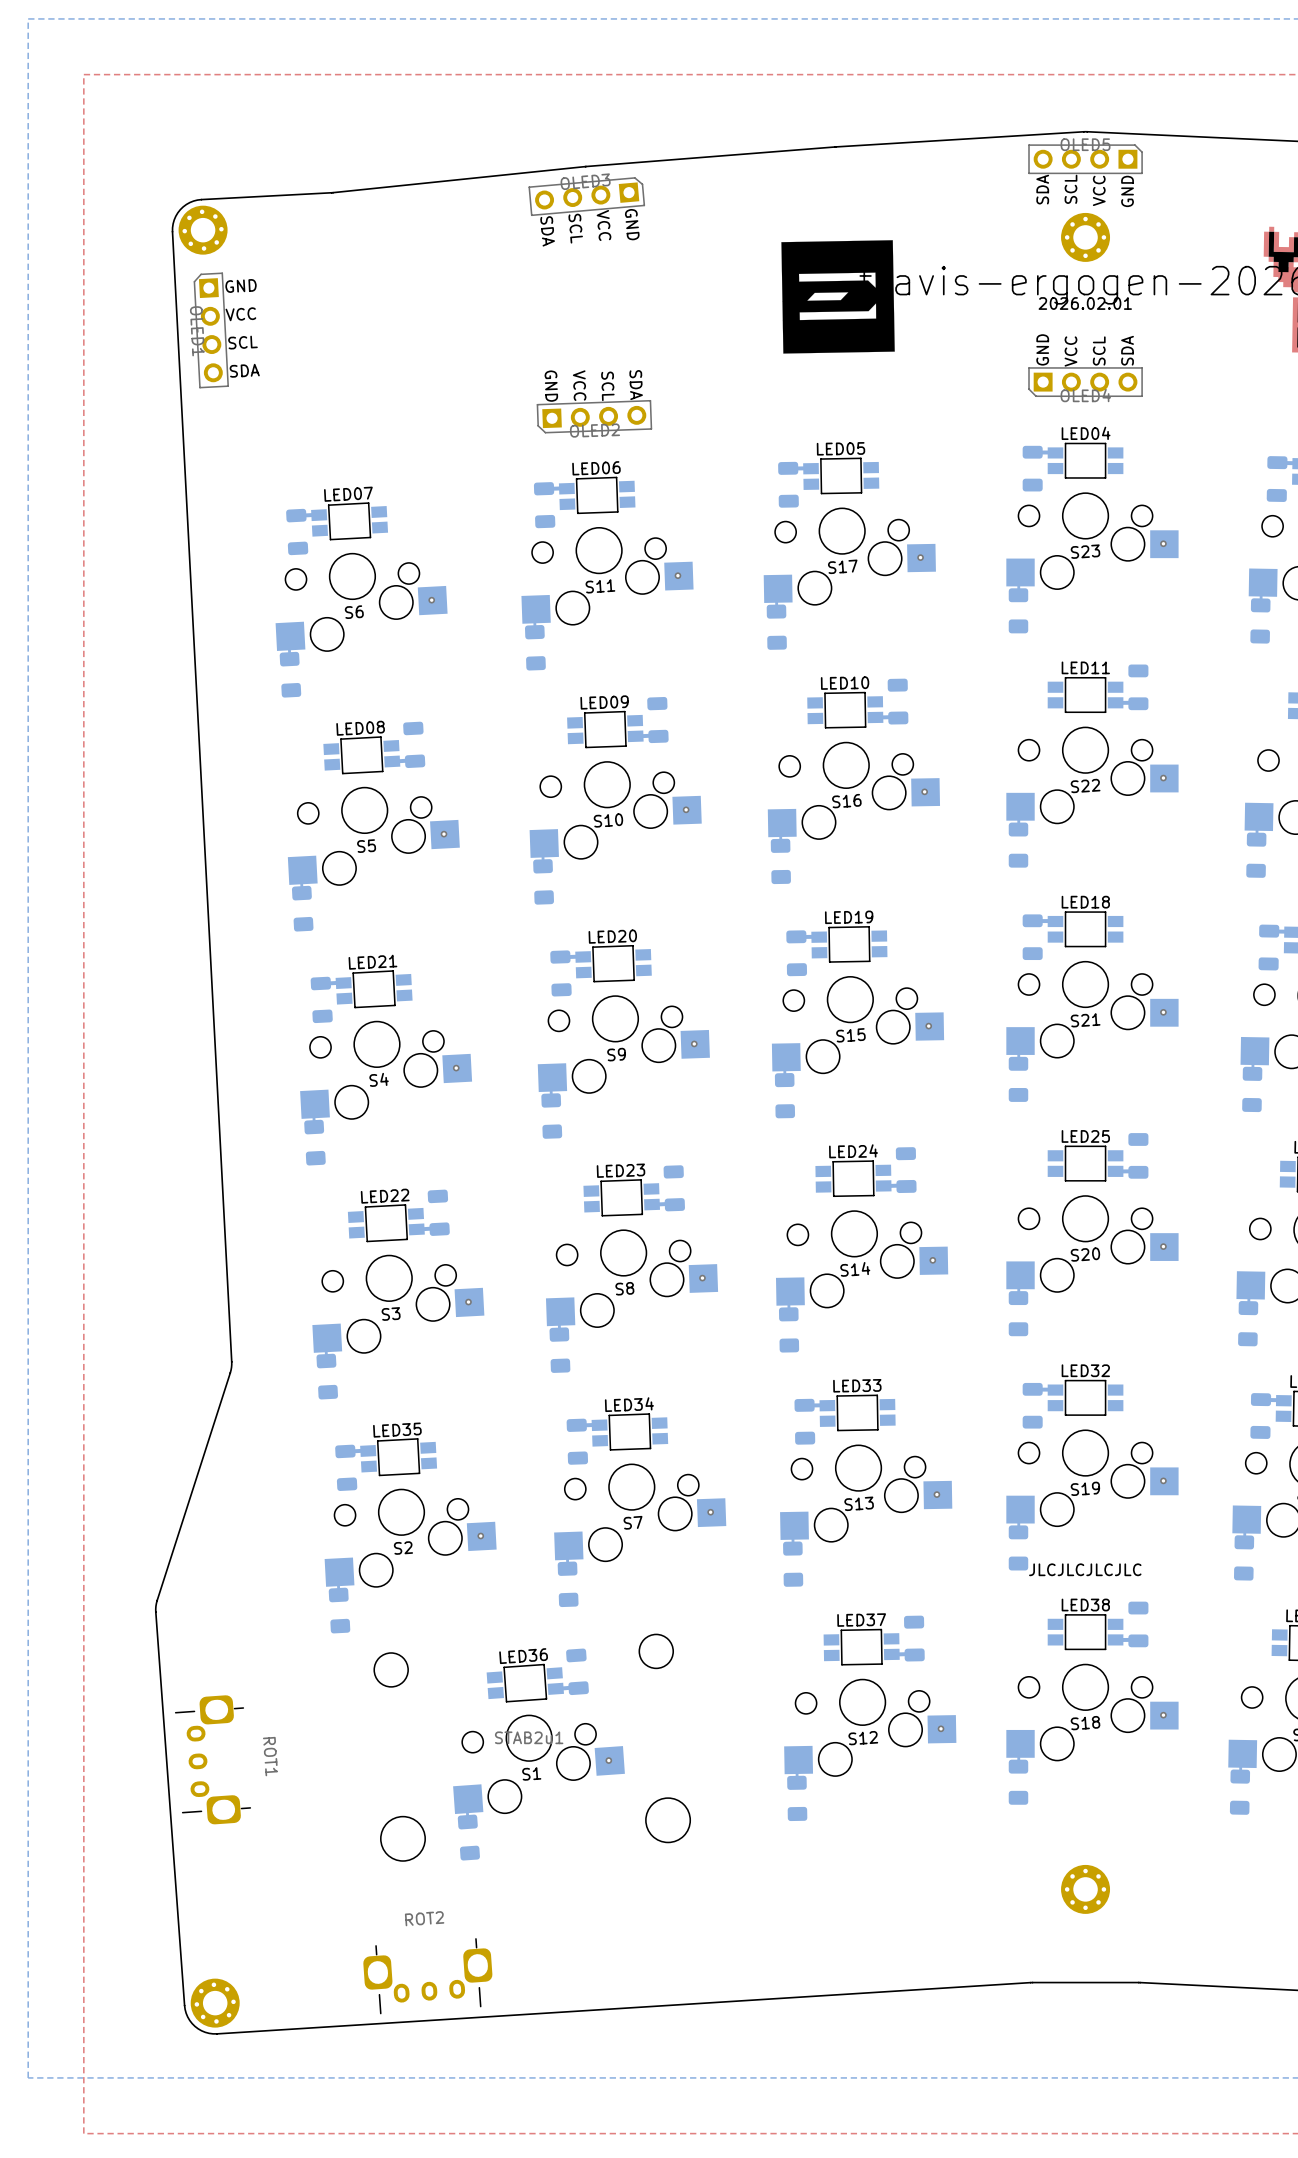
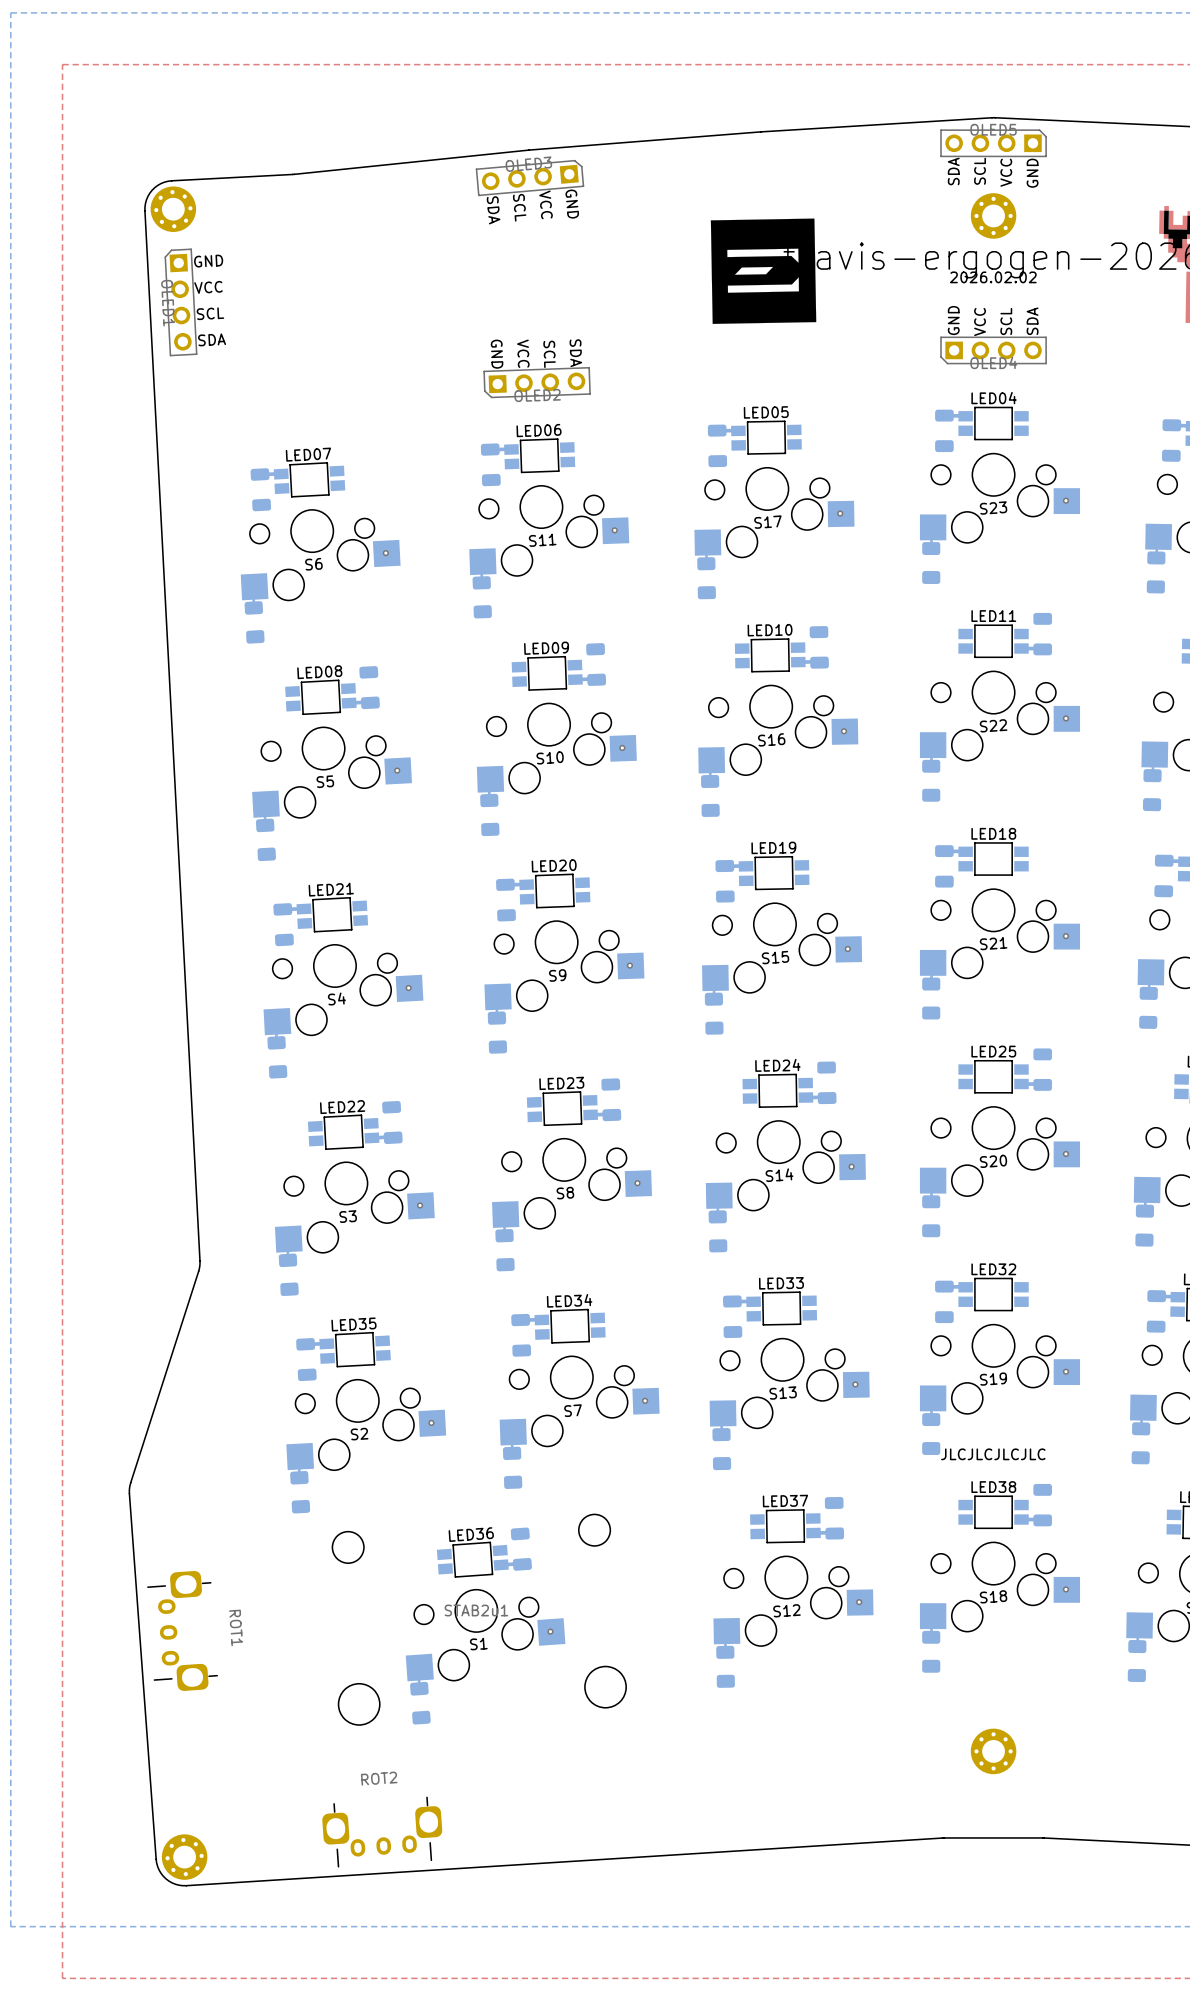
text: 2026.02.01 (1085, 303) -> 2026.02.02 (993, 277)

